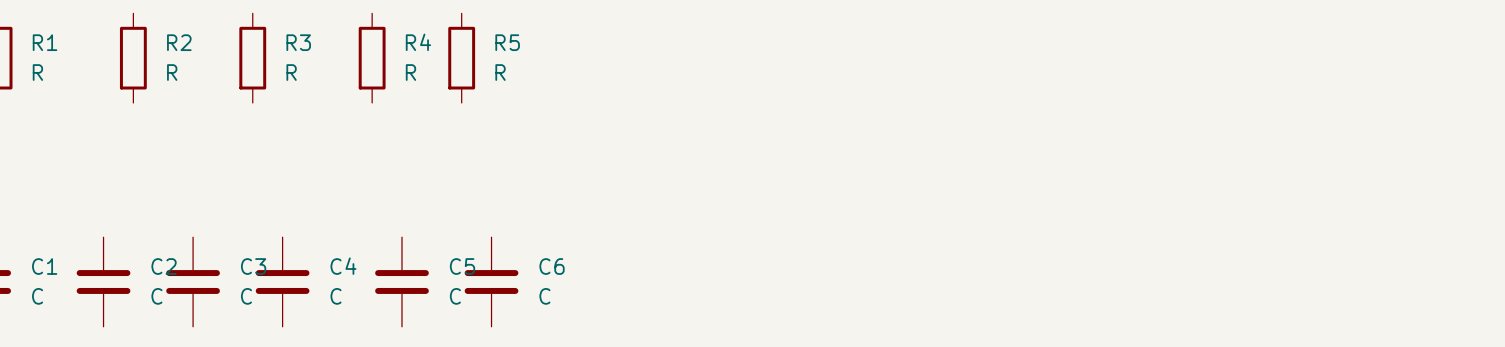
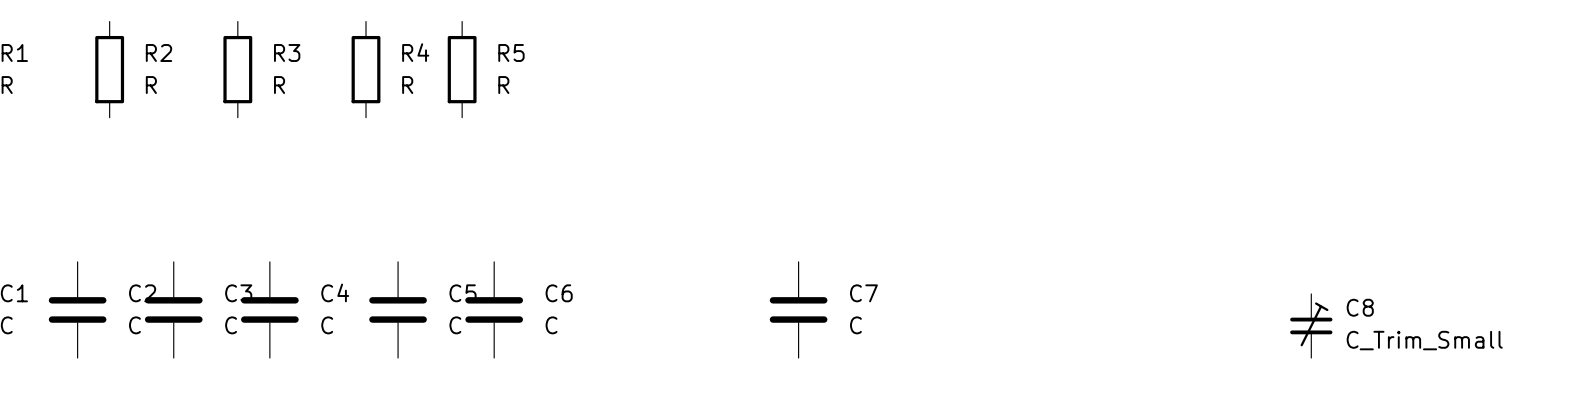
C7: none -> C (798, 309)
C8: none -> C_Trim_Small (1311, 325)

